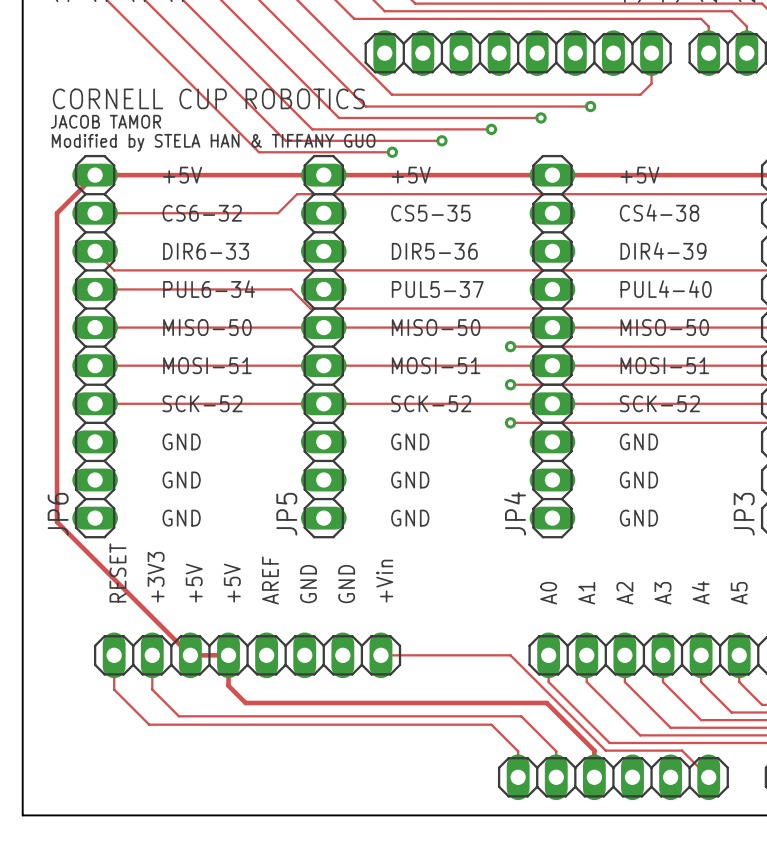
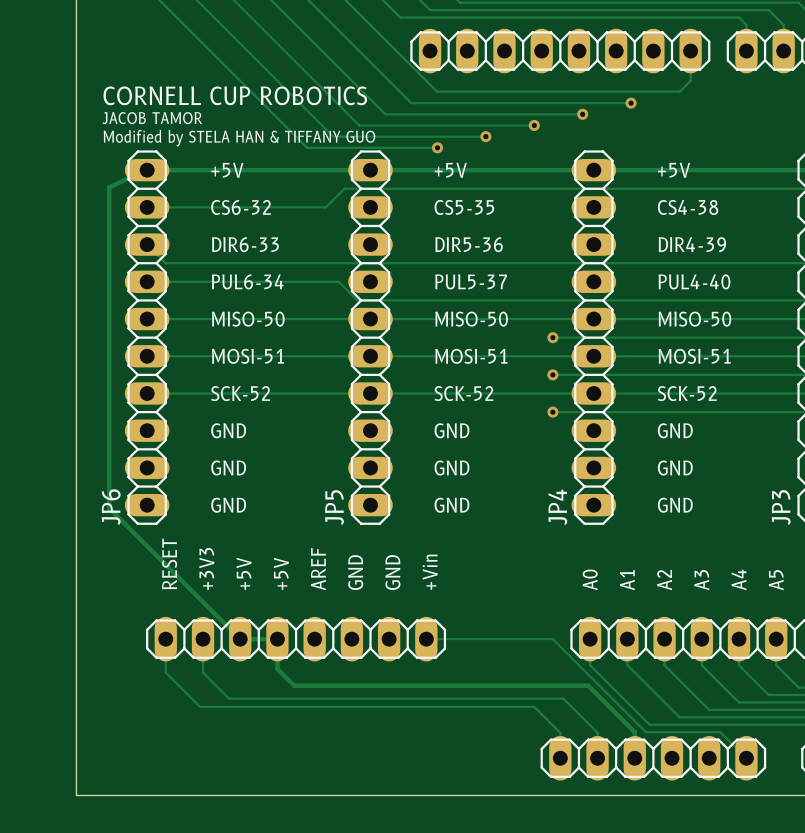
track: (95, 175) (57, 213) (57, 521) -> (149, 168) (109, 187) (109, 508)

